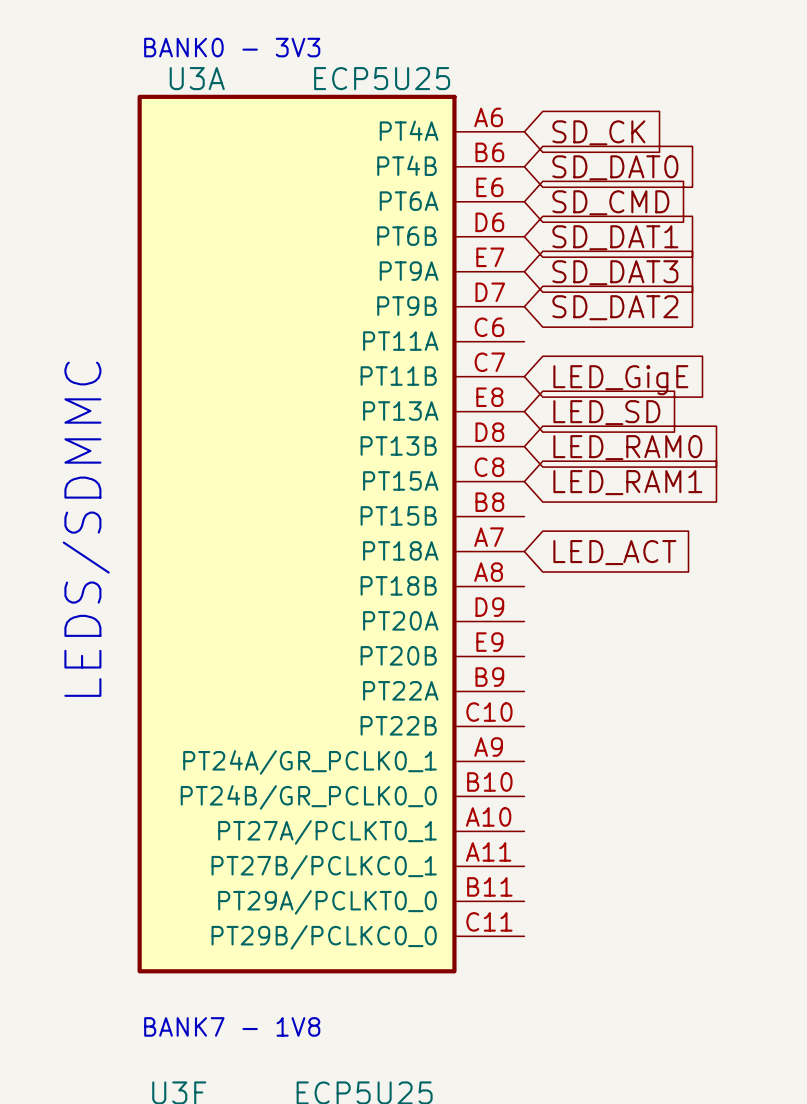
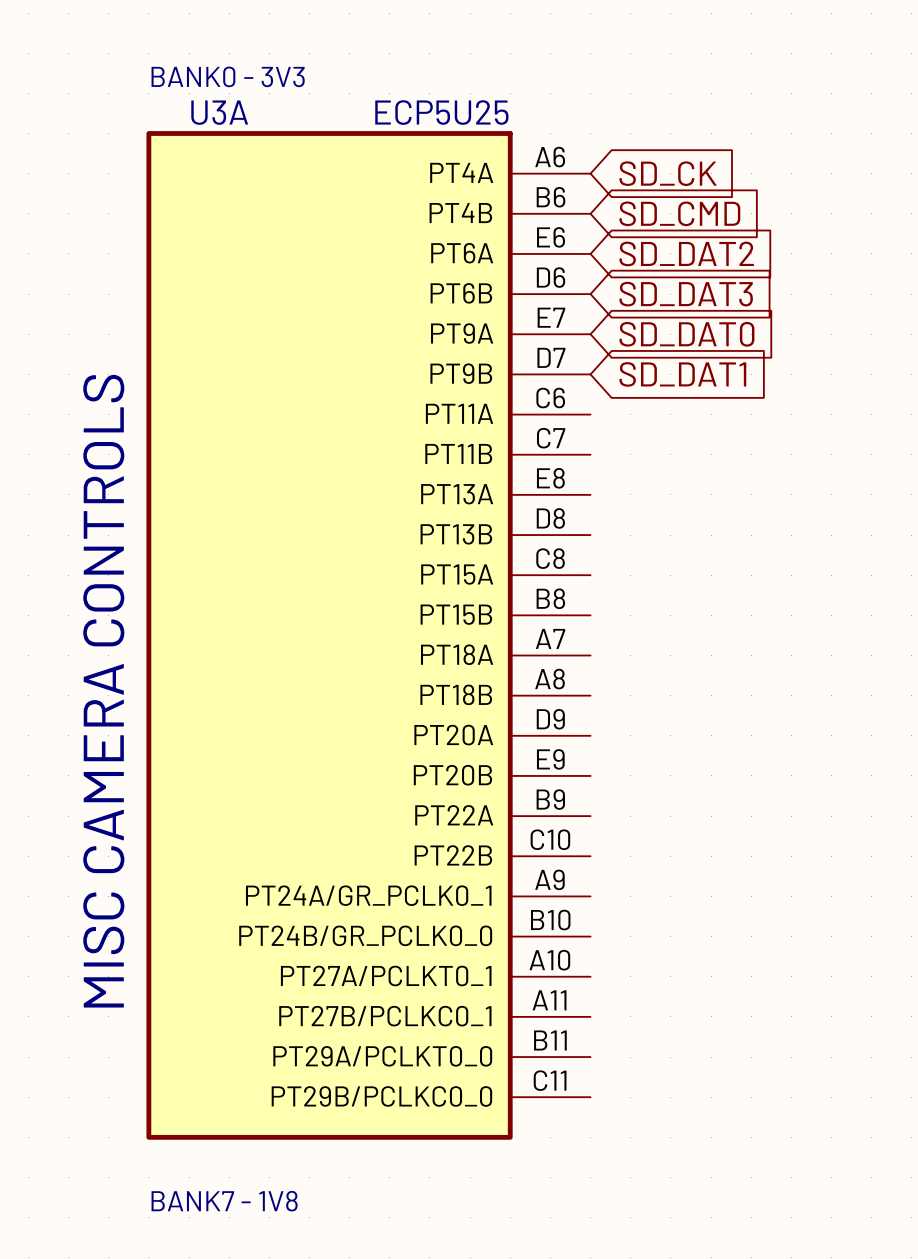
global label: SD_DAT0 (615, 167) -> SD_CMD (679, 213)
global label: SD_CMD (610, 202) -> SD_DAT2 (686, 253)
global label: SD_DAT1 (615, 237) -> SD_DAT3 (686, 294)
global label: SD_DAT3 (615, 272) -> SD_DAT0 (686, 334)
global label: SD_DAT2 (615, 307) -> SD_DAT1 (682, 374)
global label: LED_GigE (620, 380) -> none
global label: LED_SD (606, 412) -> none
global label: LED_RAM0 (627, 447) -> none
global label: LED_RAM1 (627, 482) -> none
text: LEDS/SDMMC (86, 529) -> none
text: none -> MISC CAMERA CONTROLS (103, 691)
global label: LED_ACT (614, 552) -> none

